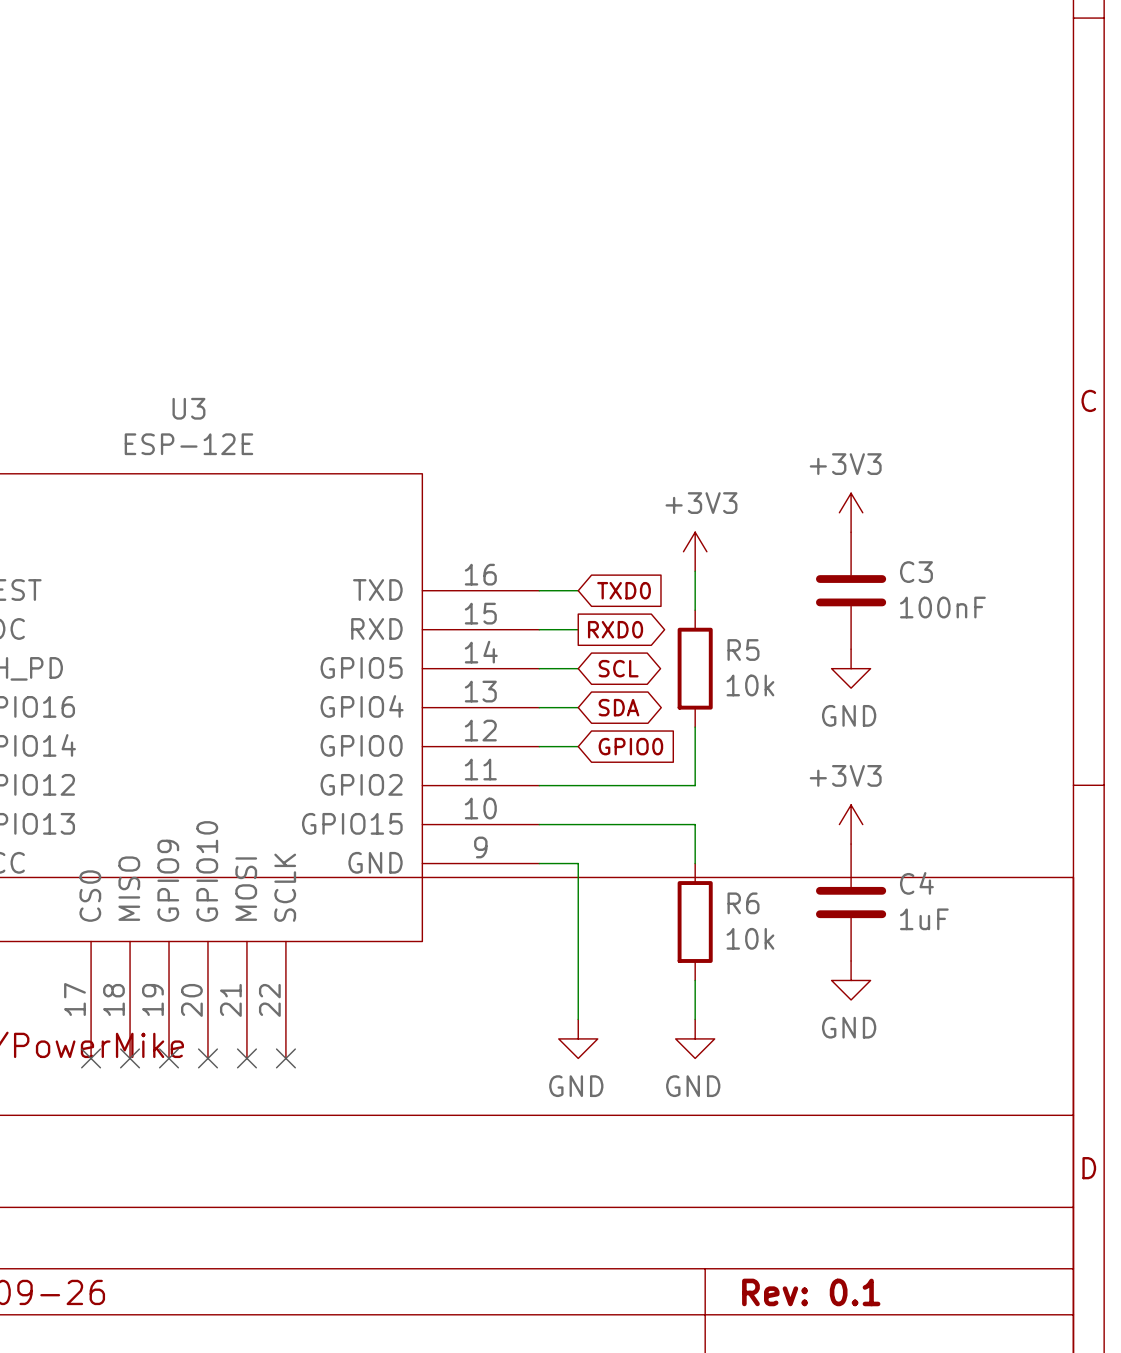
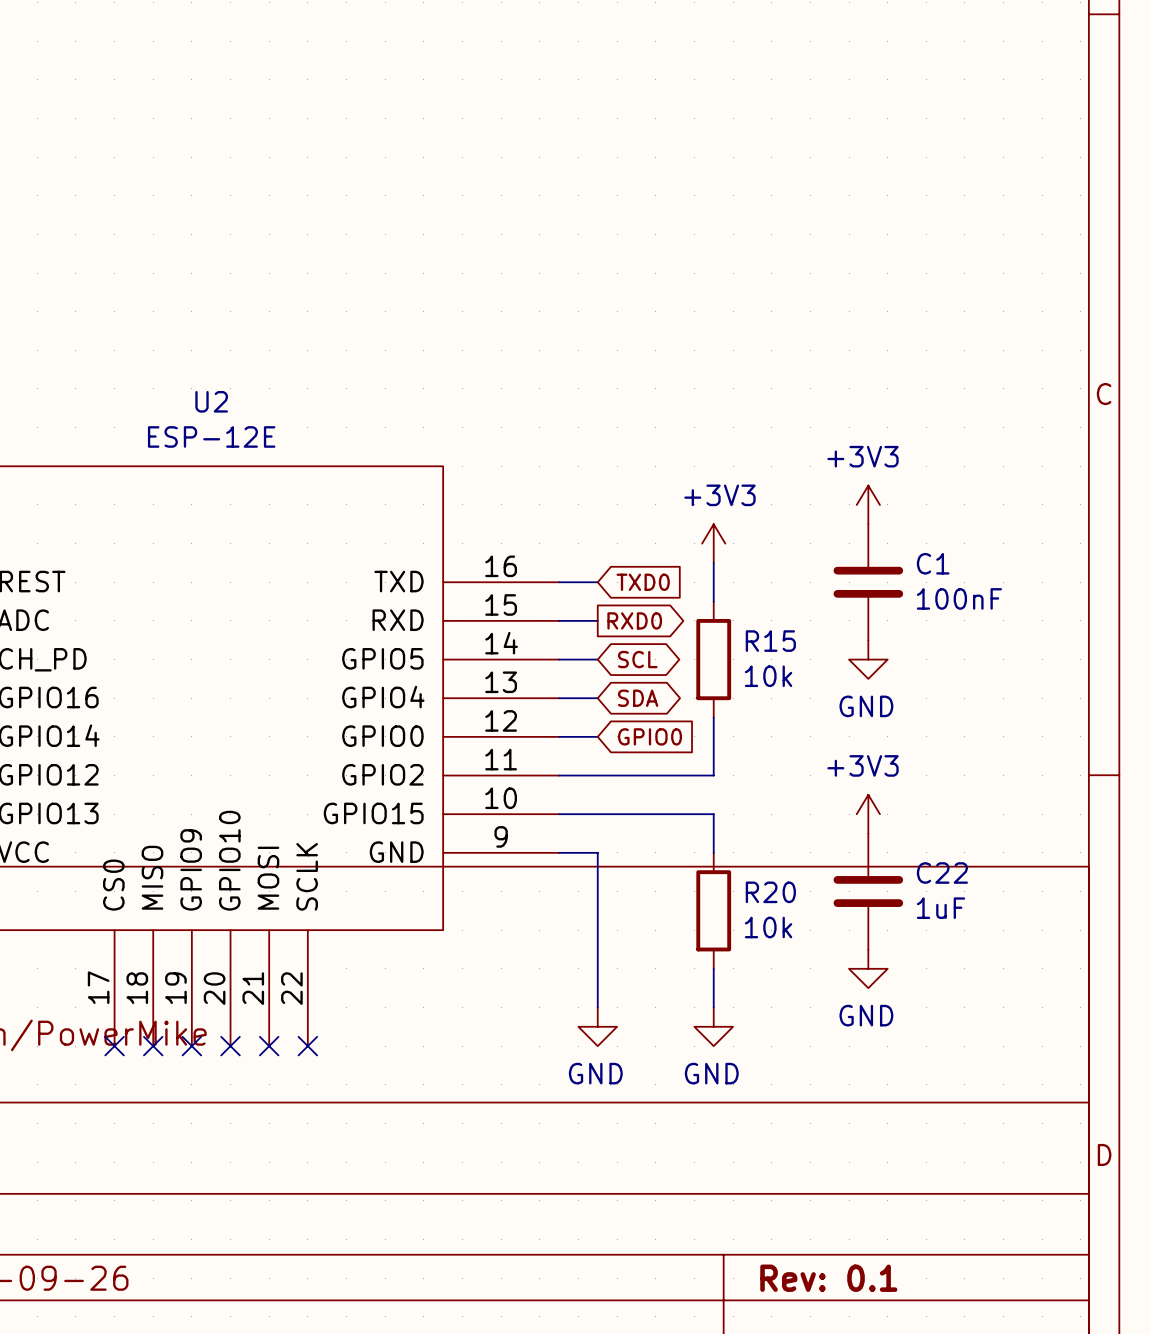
U3 name: U3 (188, 408) -> U2 (211, 401)
C3 name: C3 (916, 572) -> C1 (933, 563)
R5 name: R5 (743, 650) -> R15 (770, 641)
C4 name: C4 (916, 883) -> C22 (942, 873)
R6 name: R6 (743, 903) -> R20 (770, 892)

